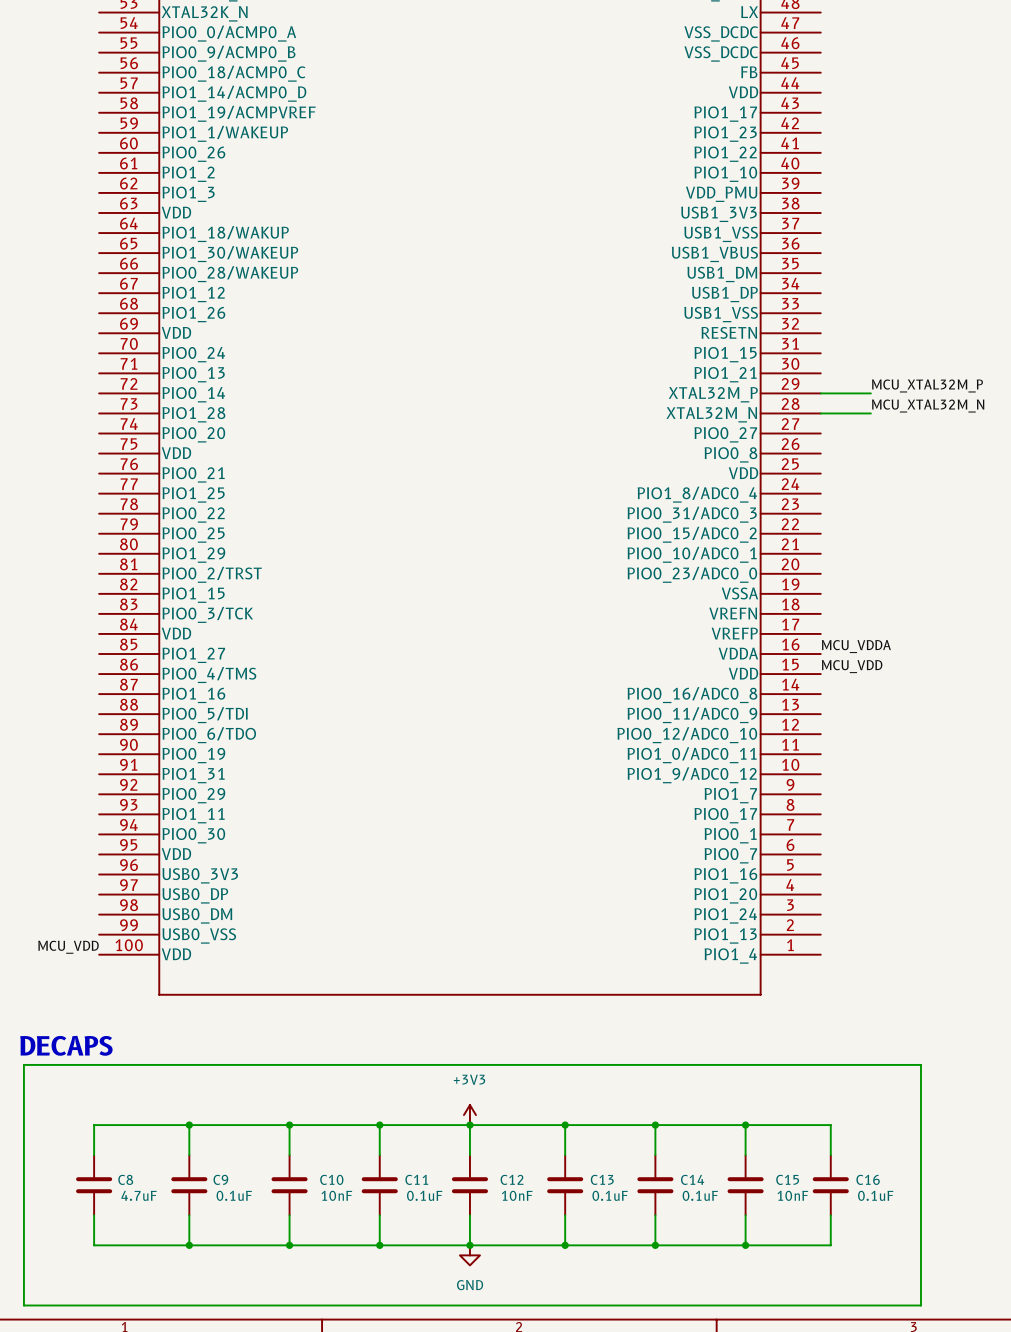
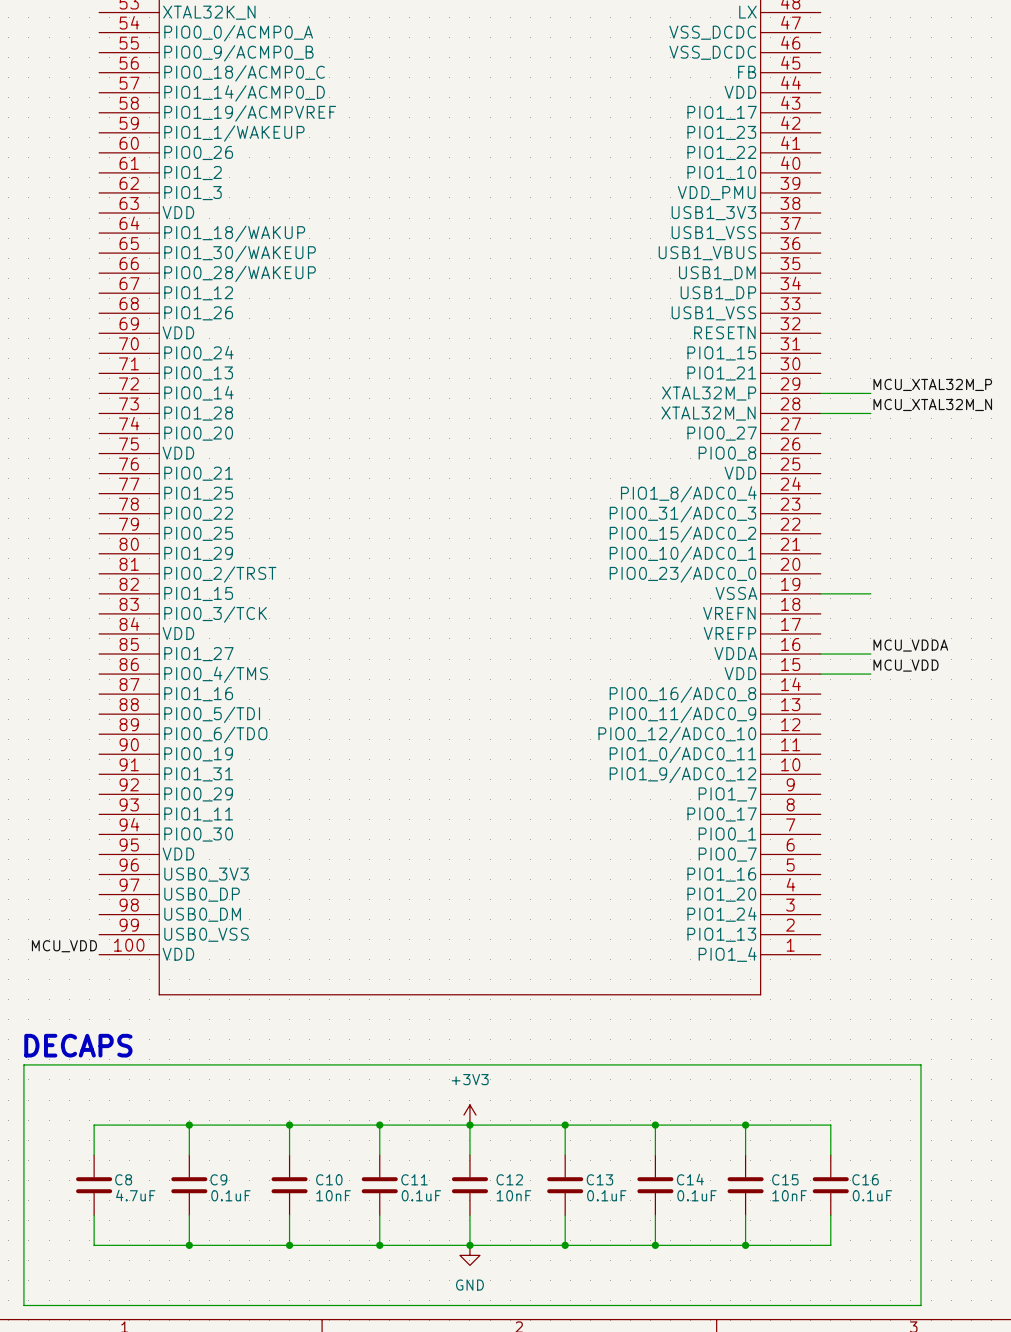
wire: none -> (820, 593) (870, 593)
label position: MCU_VDDA (856, 646) -> MCU_VDDA (910, 645)
wire: none -> (820, 654) (870, 654)
label position: MCU_VDD (852, 666) -> MCU_VDD (906, 665)
wire: none -> (820, 674) (870, 674)

